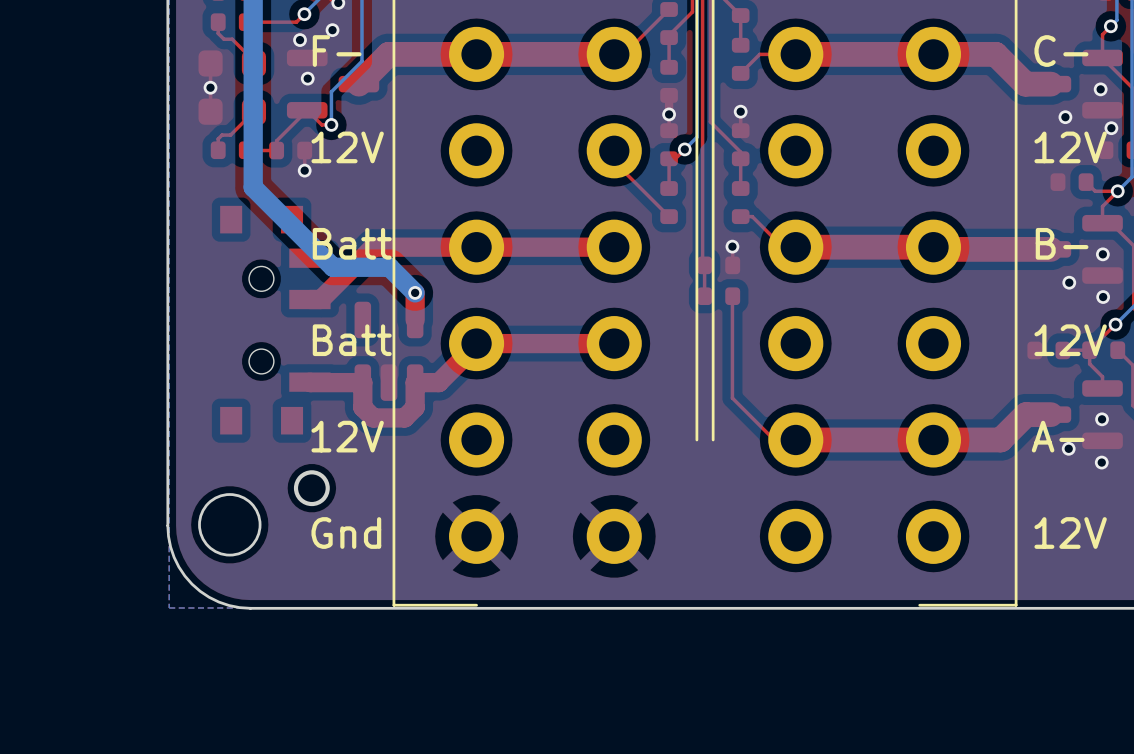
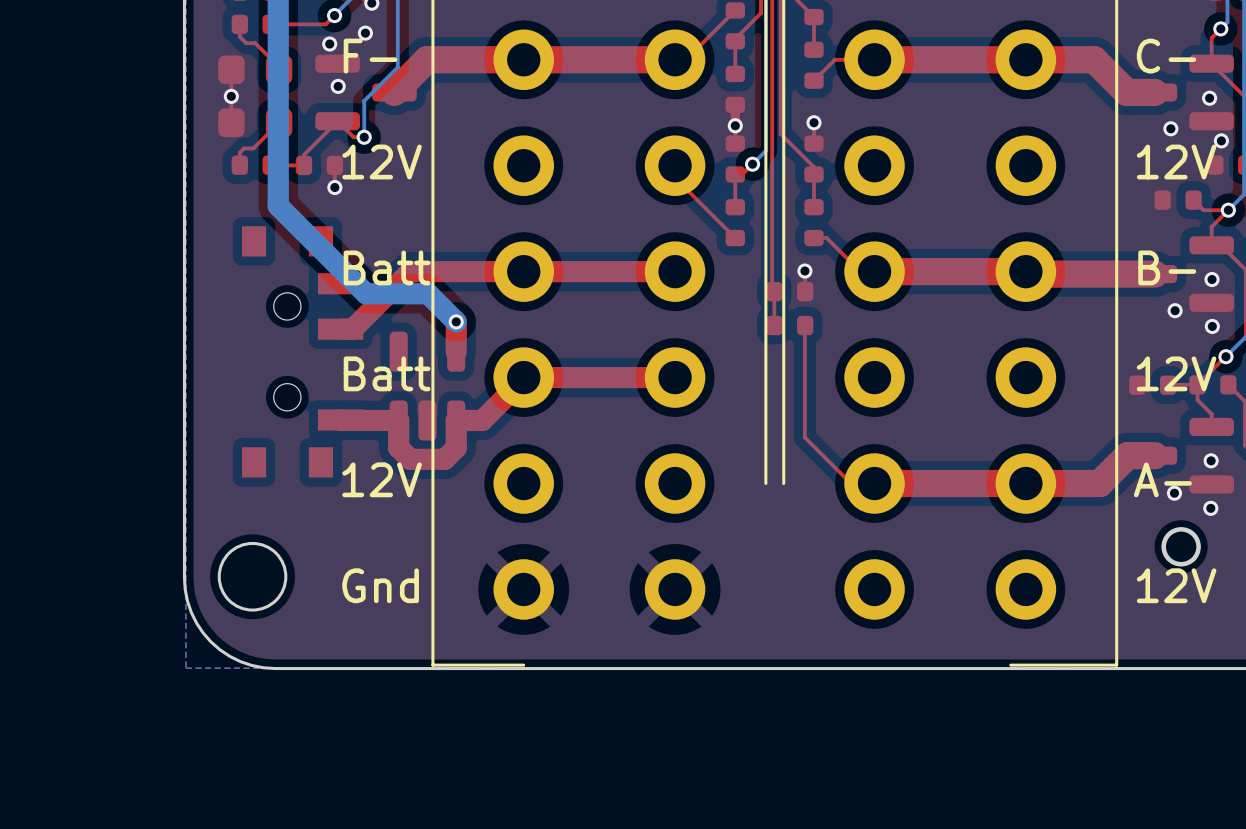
round board edge: [293, 470, 330, 507] -> none
round board edge: none -> [1161, 527, 1201, 567]

